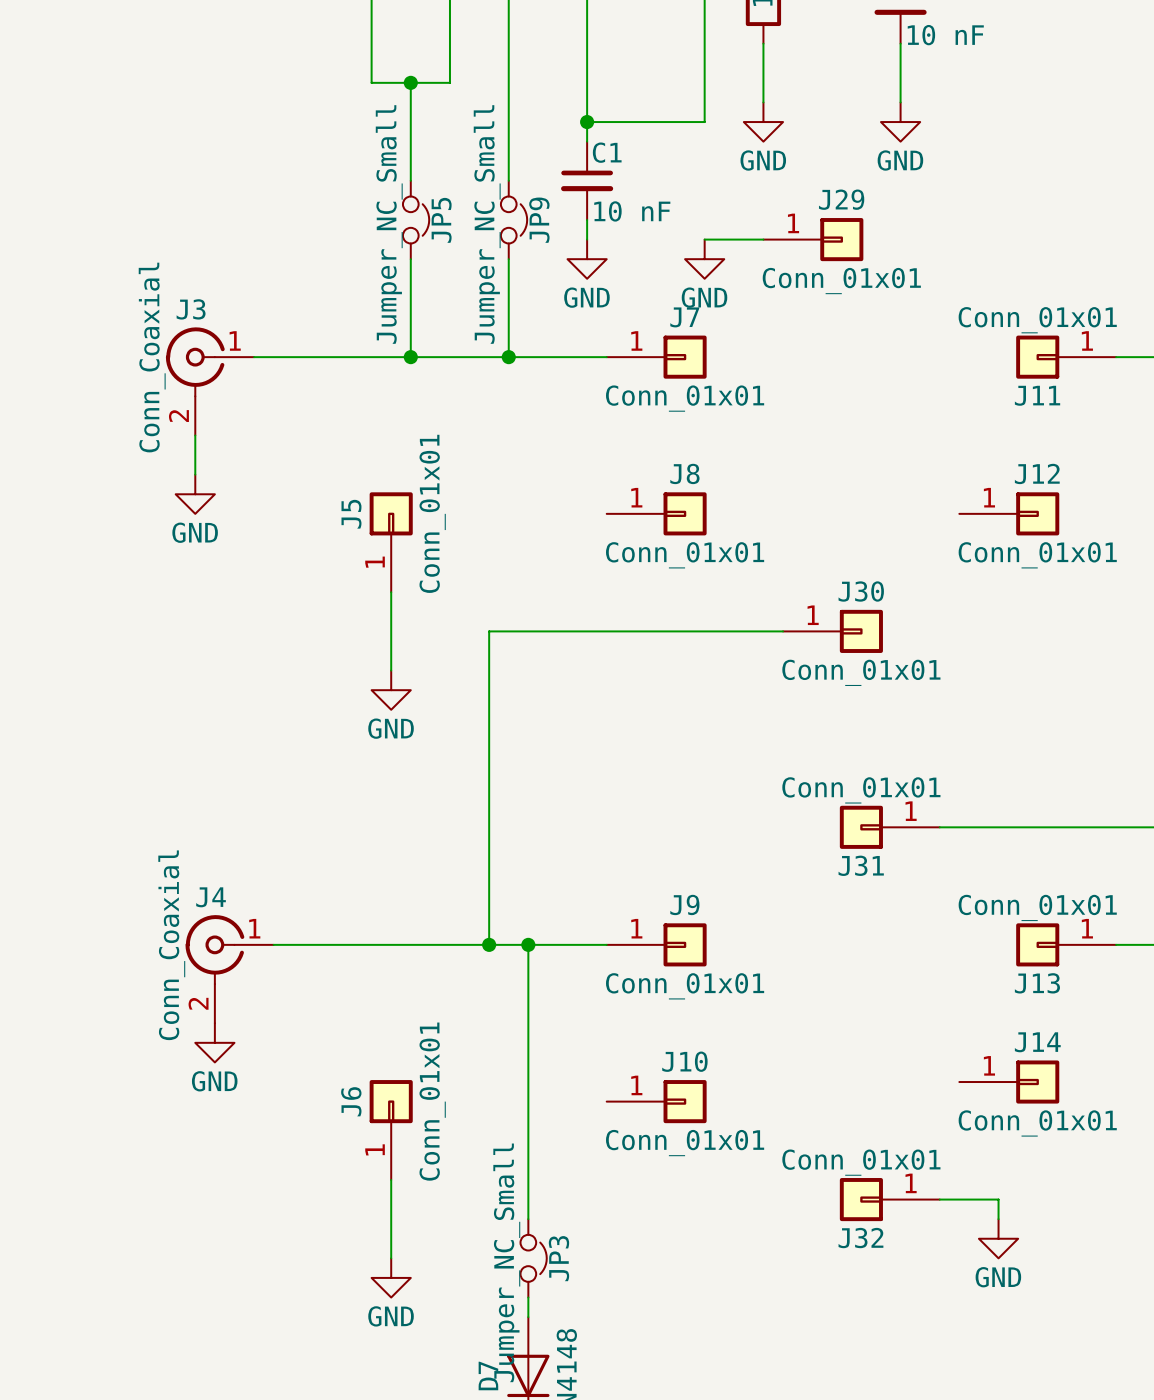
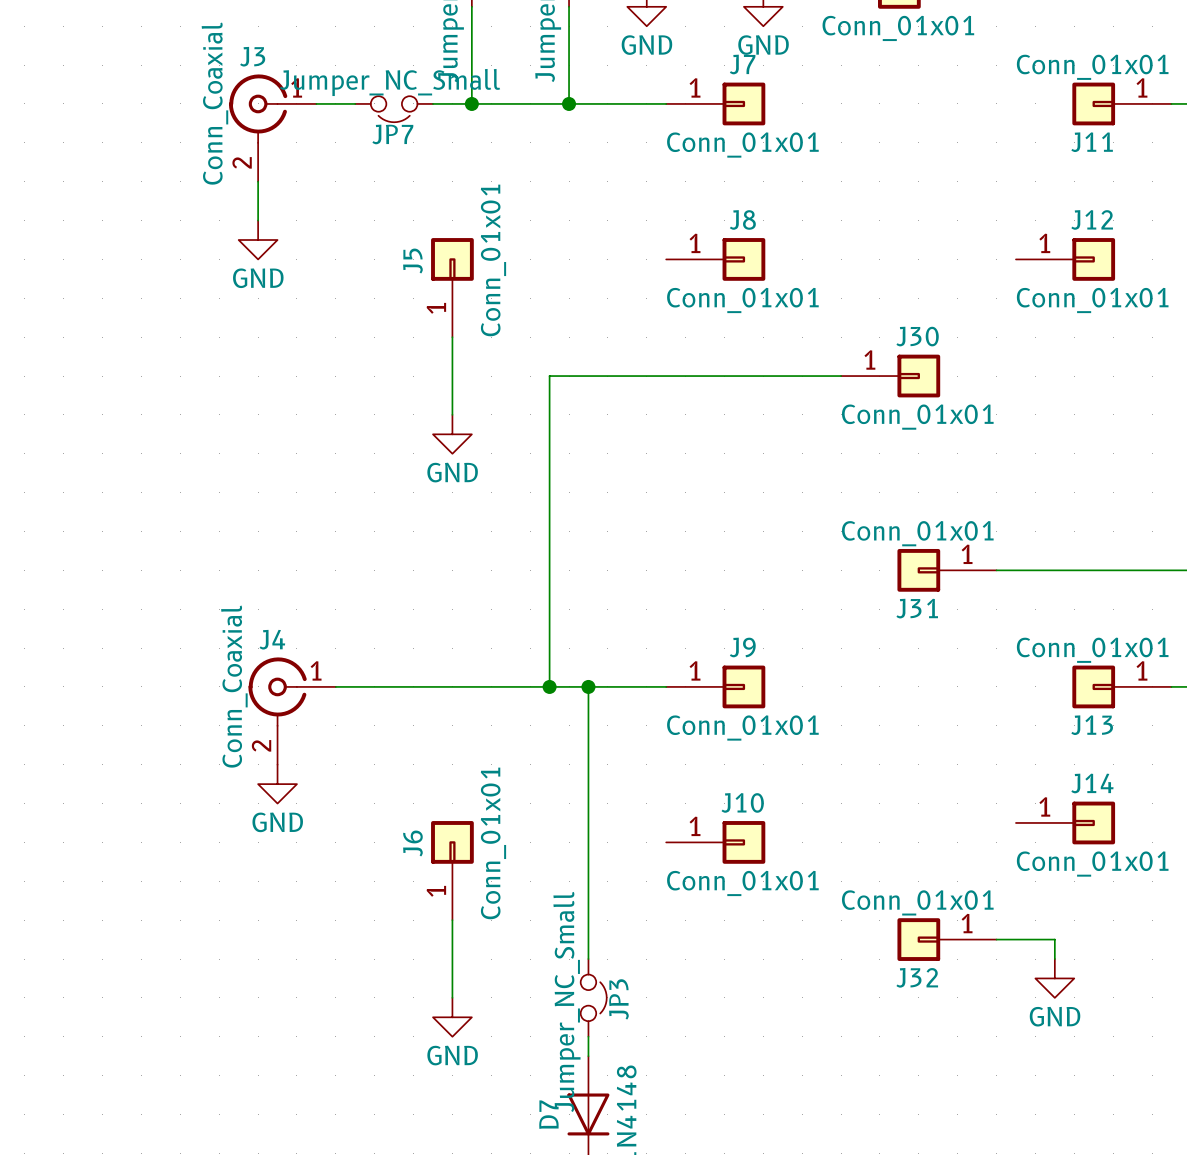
wire: (293, 357) (371, 357) -> none
JP7: none -> Jumper_NC_Small (394, 109)

